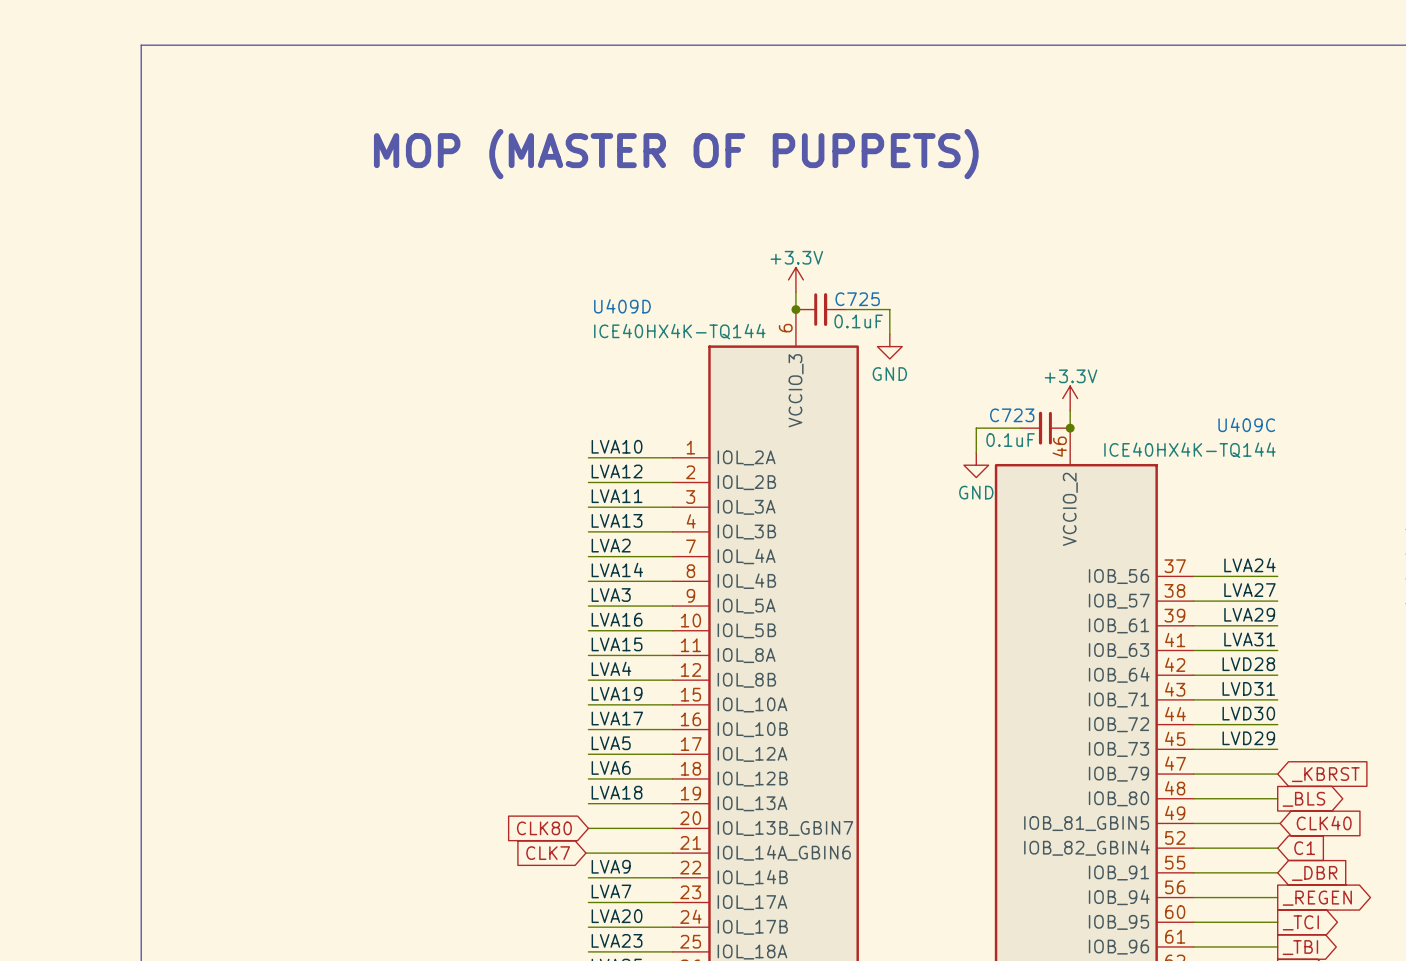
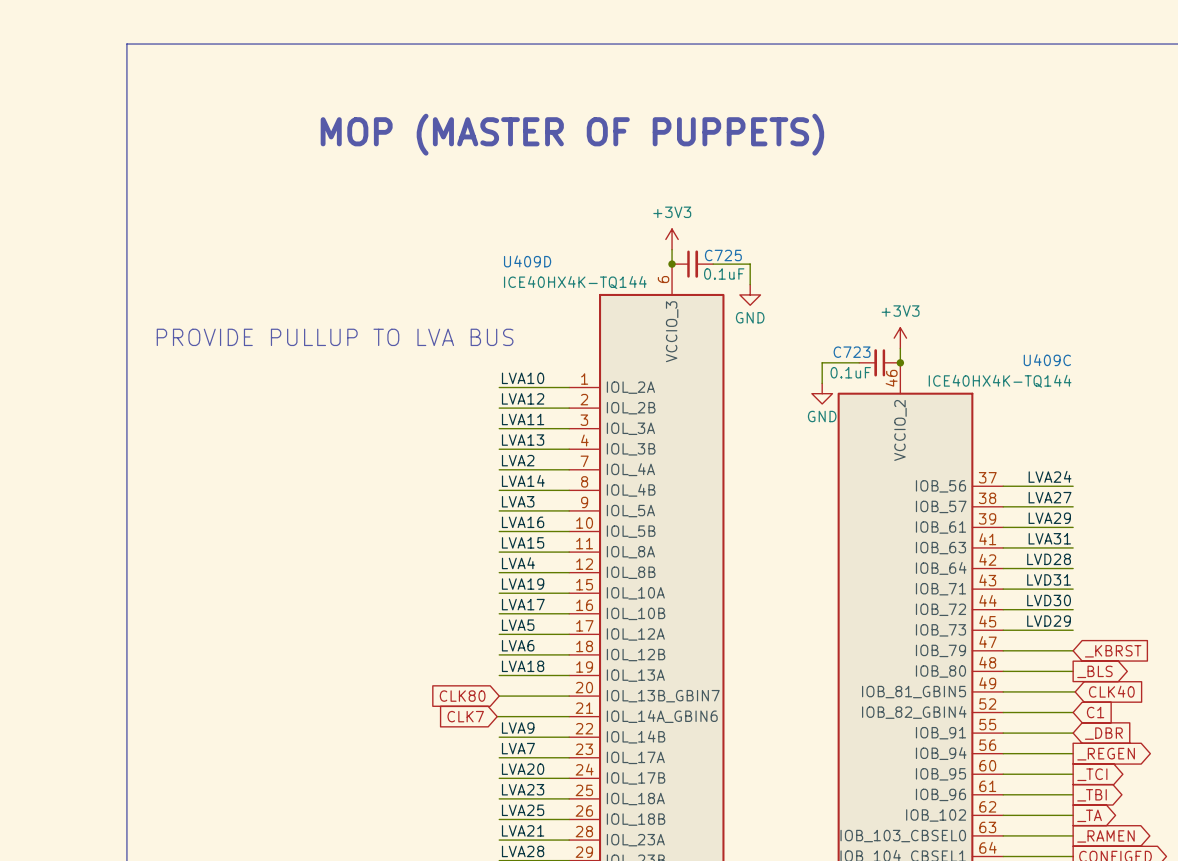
power symbol: +3.3V (795, 279) -> +3V3 (672, 239)
text: none -> PROVIDE PULLUP TO LVA BUS (335, 337)
power symbol: +3.3V (1070, 398) -> +3V3 (900, 338)

